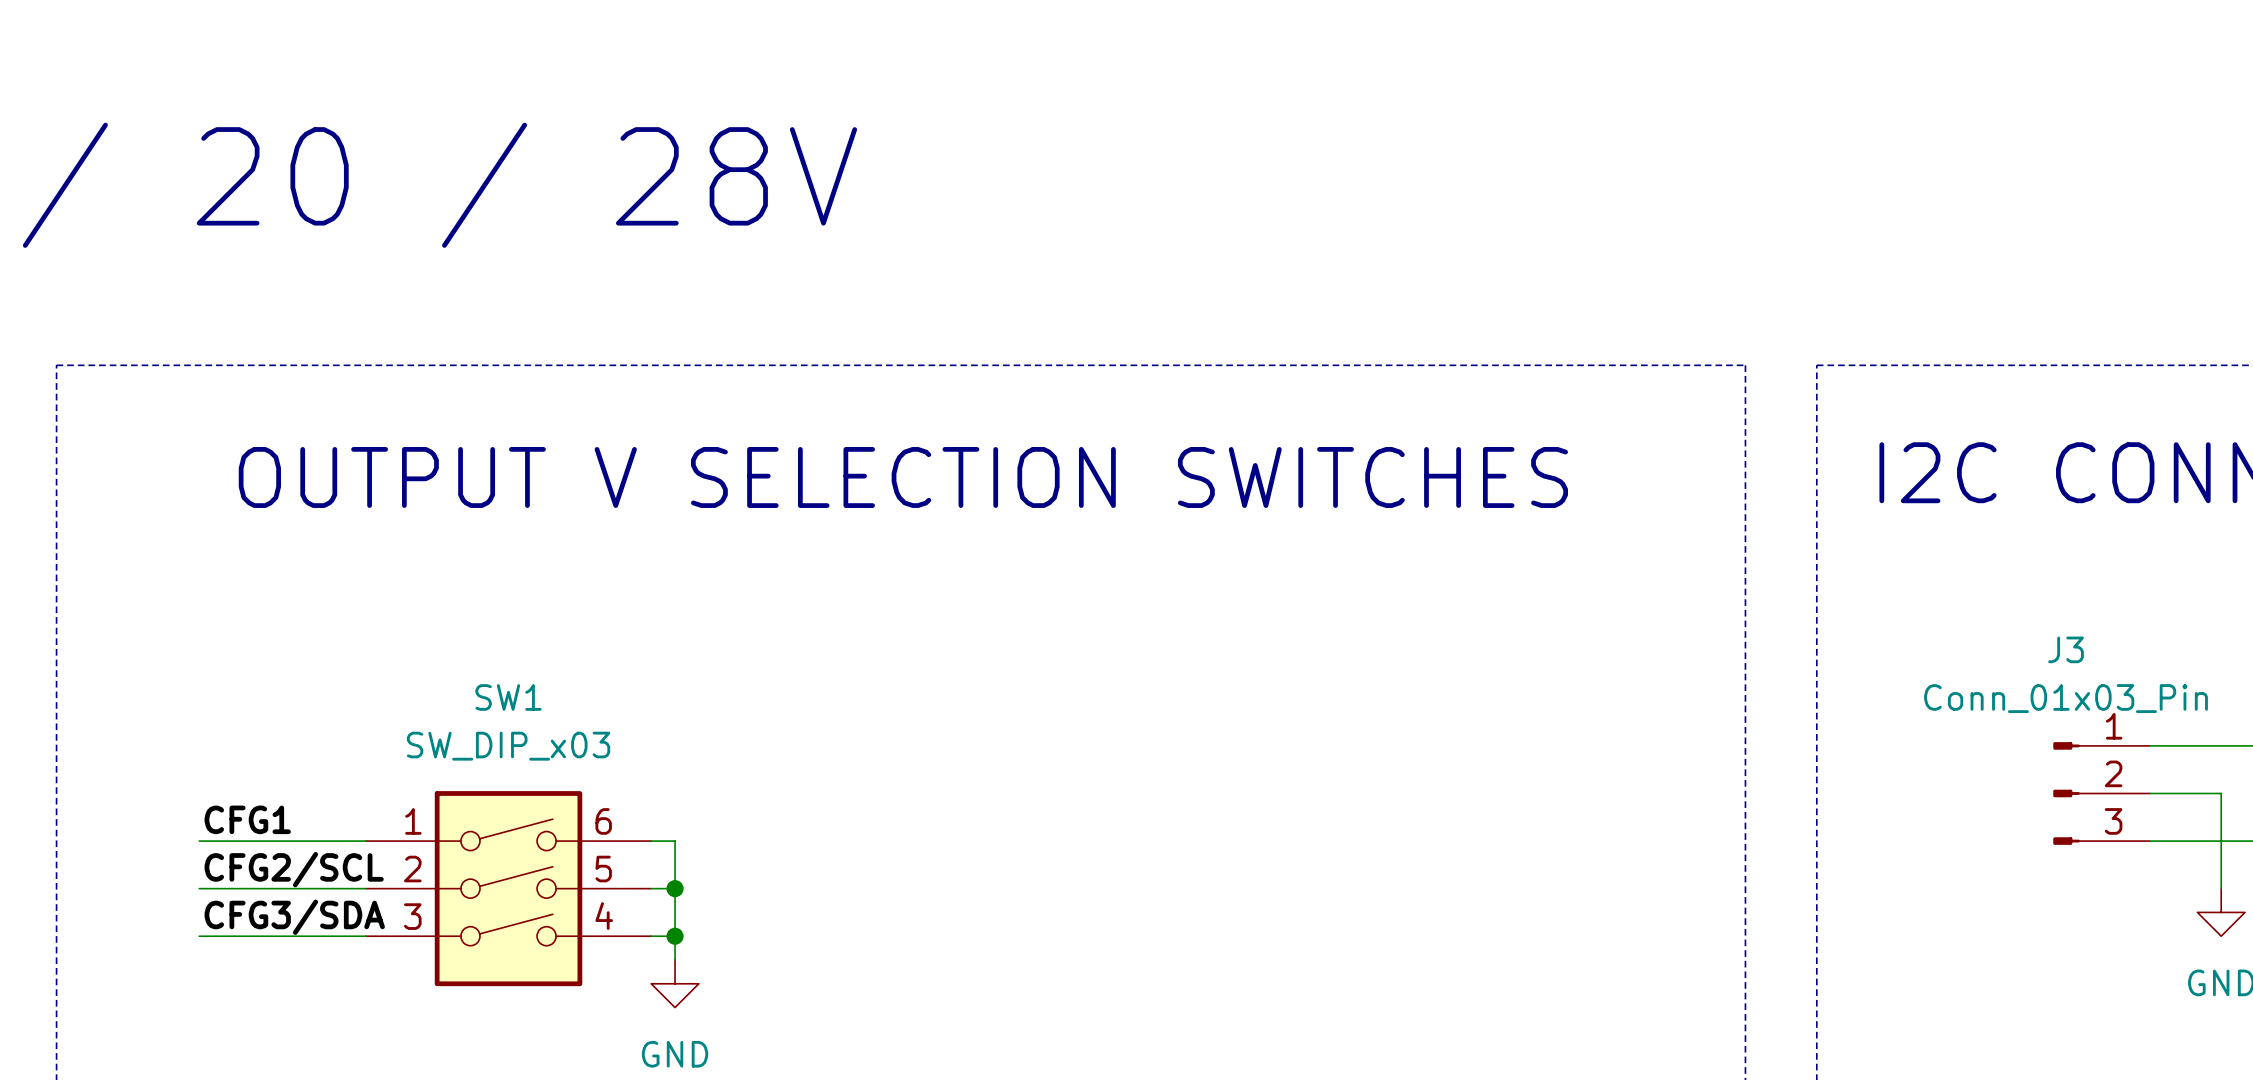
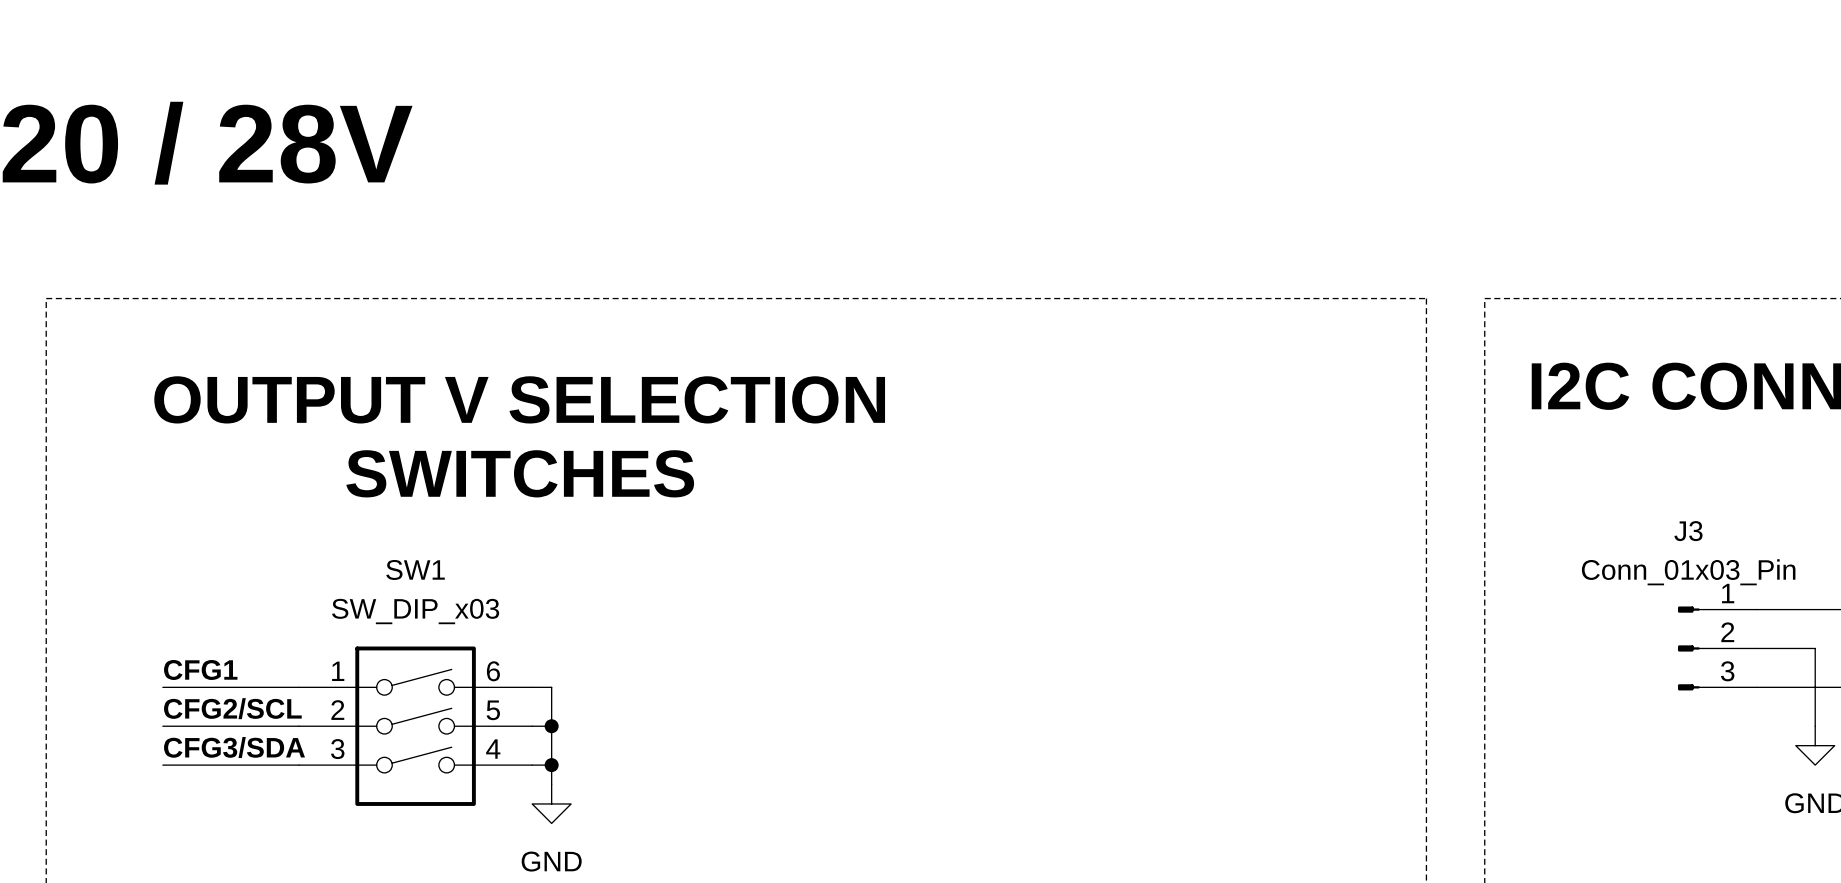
text: OUTPUT V SELECTION SWITCHES (903, 477) -> OUTPUT V SELECTION (519, 399)
text: none -> SWITCHES (520, 473)

